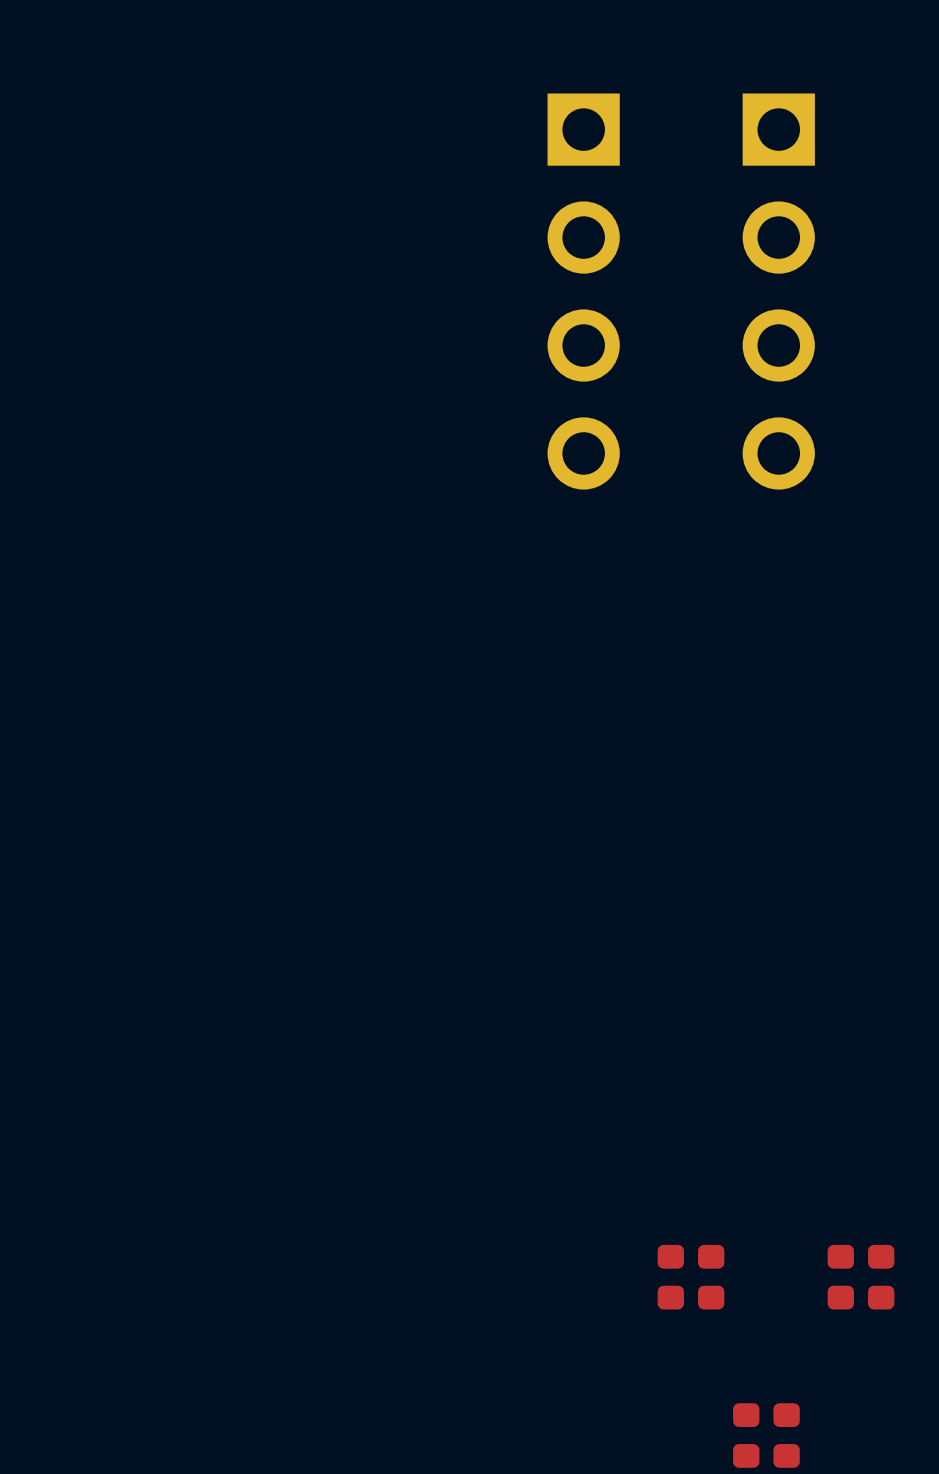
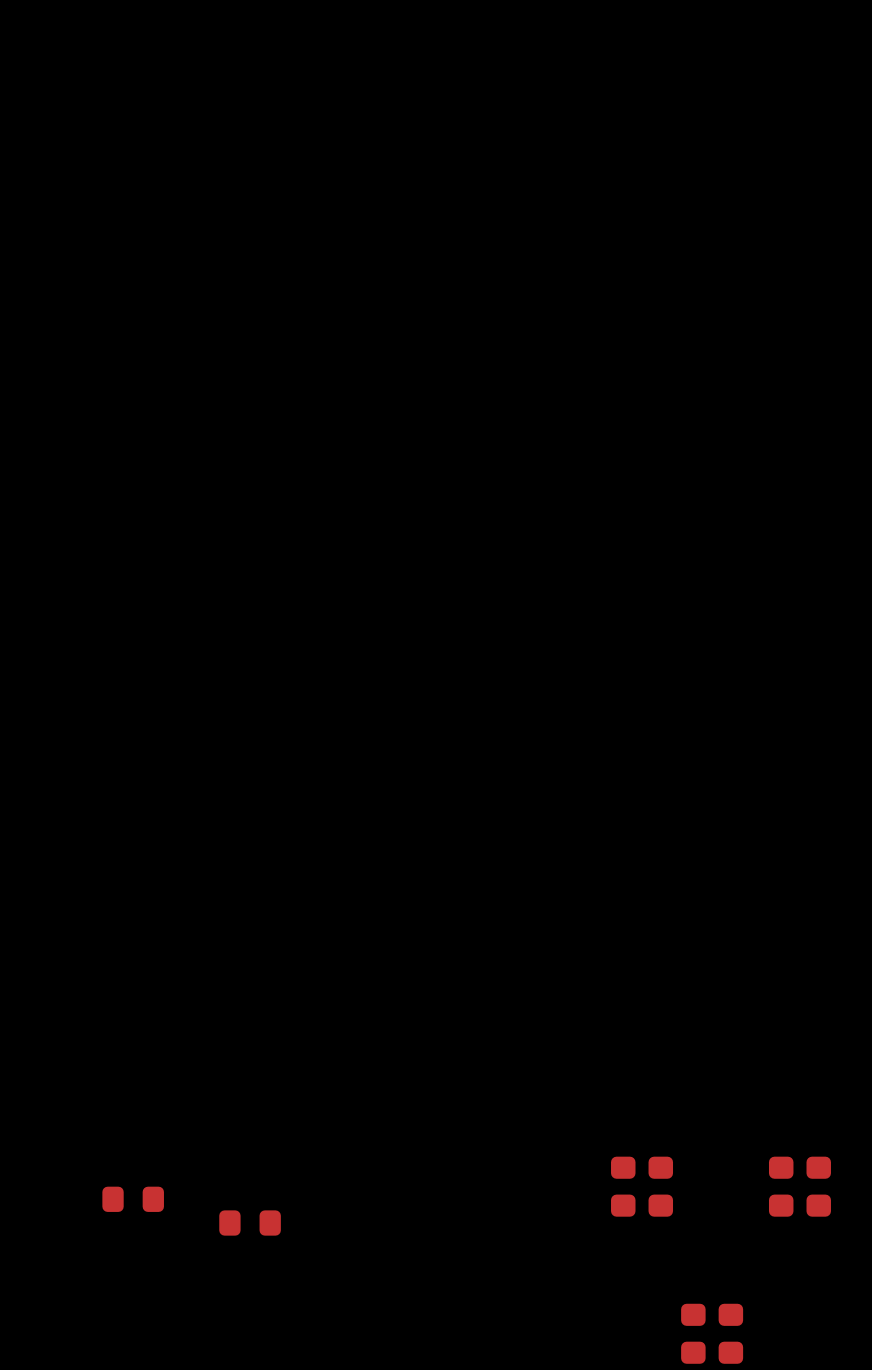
part: (583, 291) -> none
part: (778, 291) -> none
part: none -> (133, 1199)
part: none -> (250, 1223)

